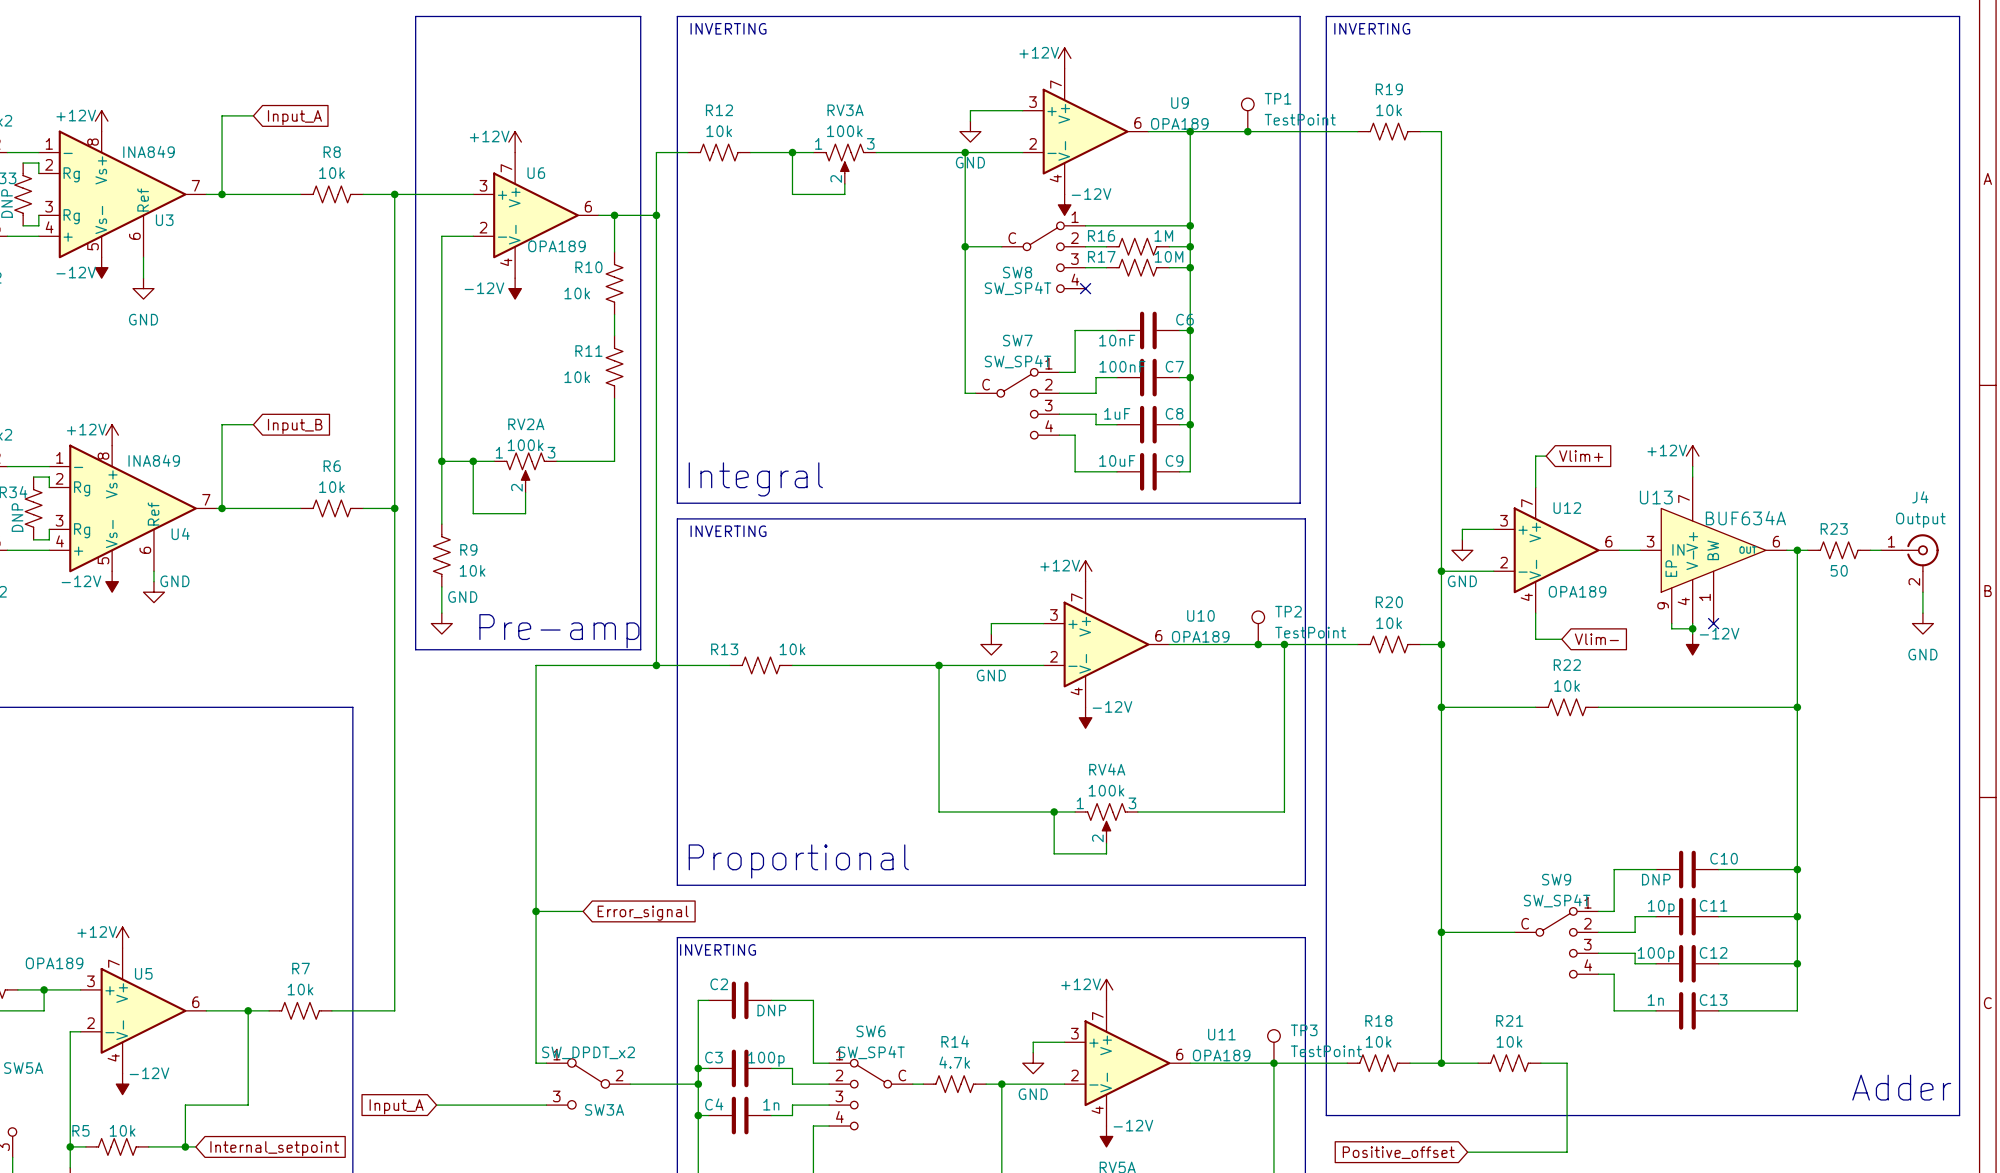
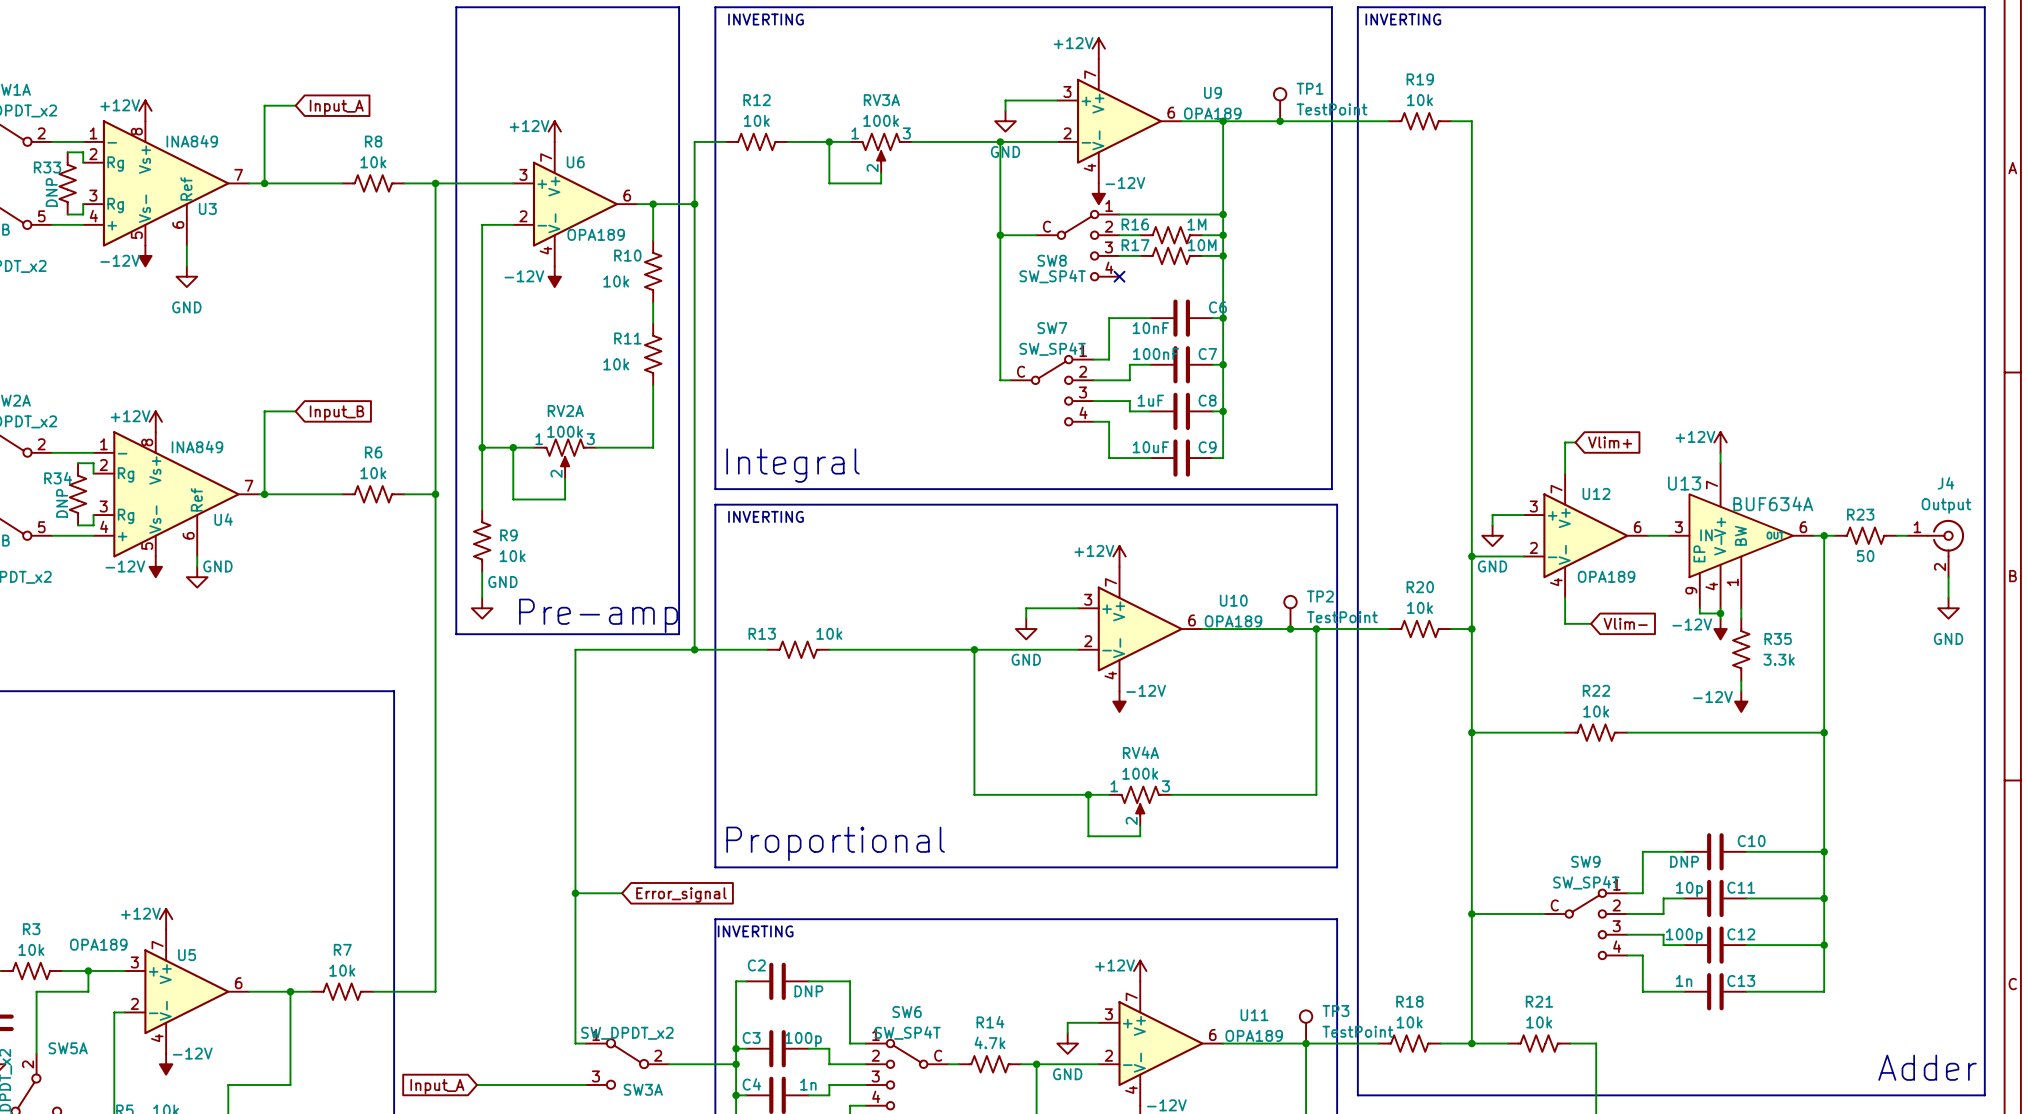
wire: none -> (1741, 608) (1741, 618)
no-connect mark: (1713, 623) -> none
power symbol text position: -12V (1719, 633) -> -12V (1692, 624)
R35: none -> 3.3k (1741, 649)
wire: none -> (1741, 680) (1741, 691)
wire: (1441, 707) (1535, 707) -> (1471, 732) (1565, 732)
junction position: (1441, 707) -> (1471, 732)
R22 position: (1567, 707) -> (1596, 732)
wire: (1598, 707) (1797, 707) -> (1627, 732) (1824, 732)
junction position: (1797, 707) -> (1824, 732)
power symbol: none -> -12V (1741, 701)

